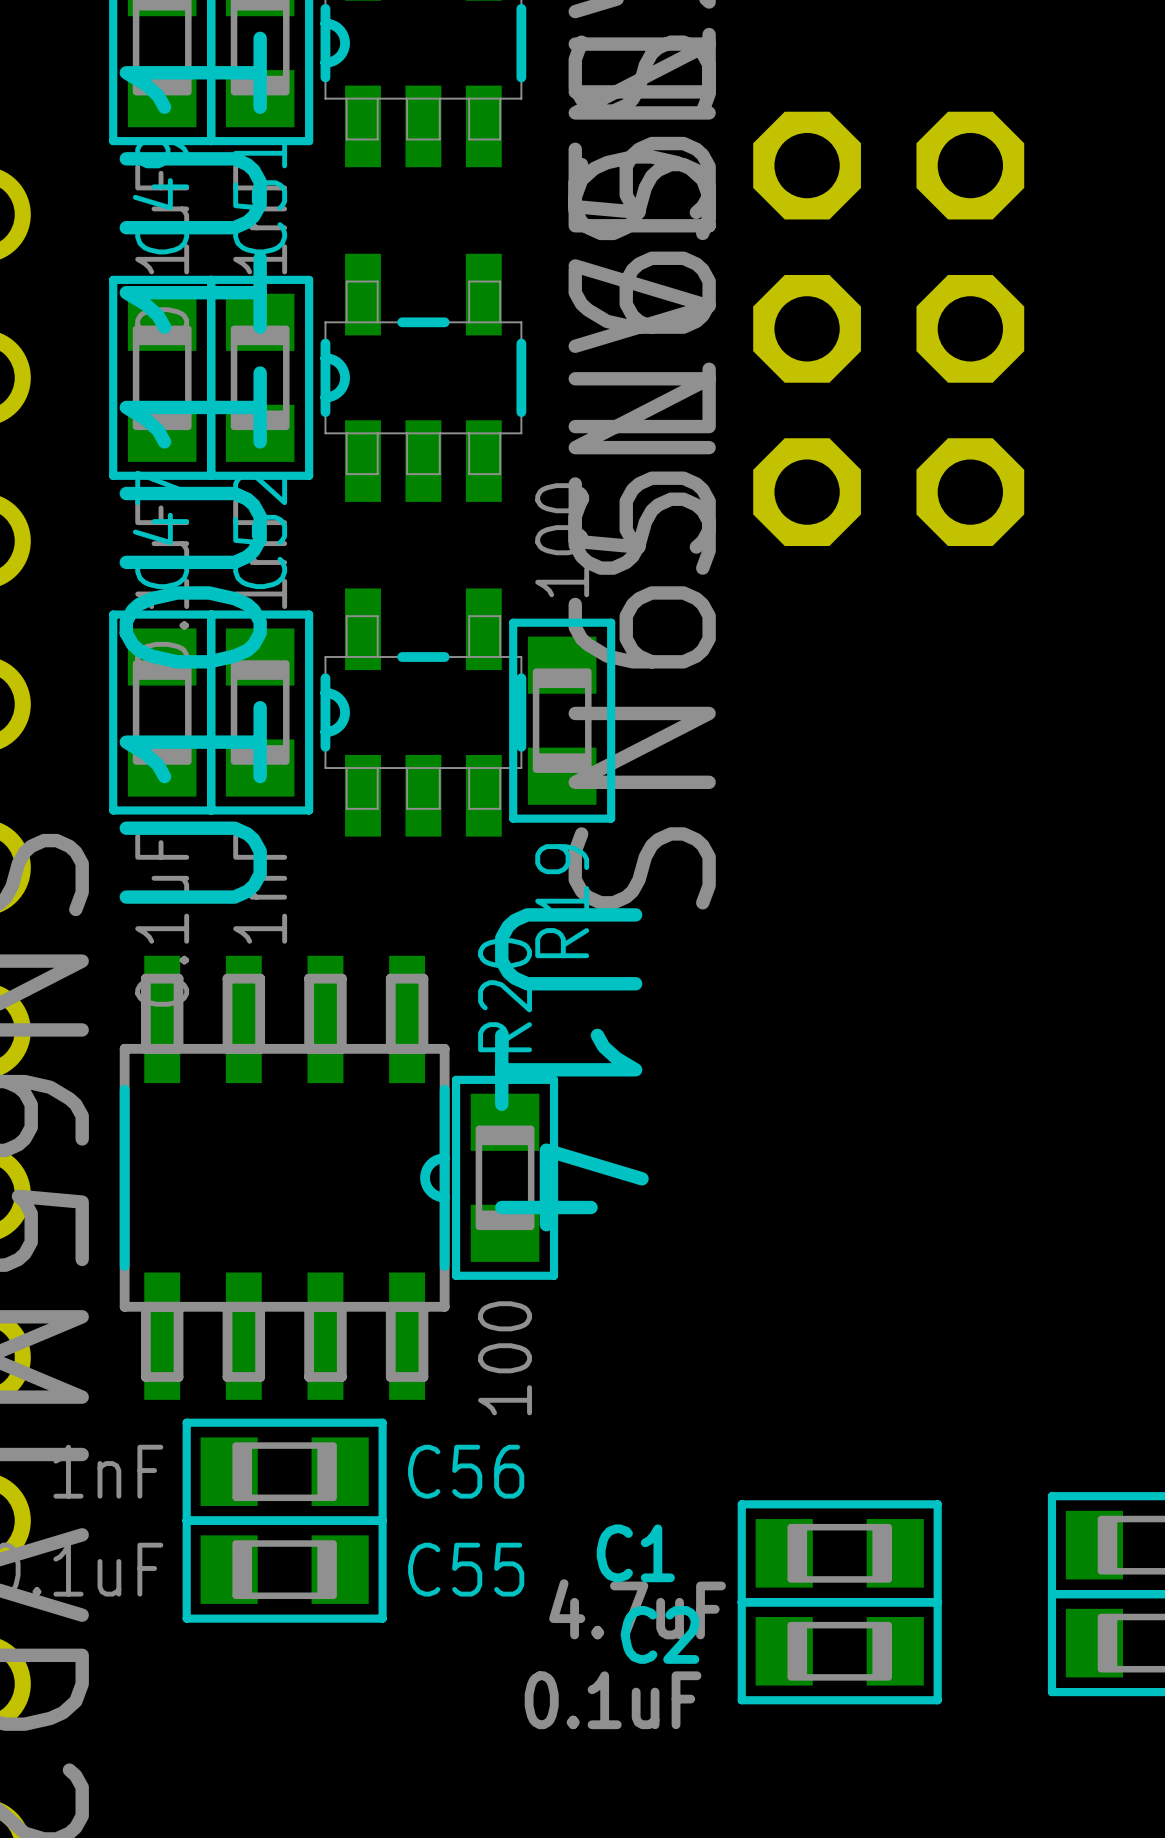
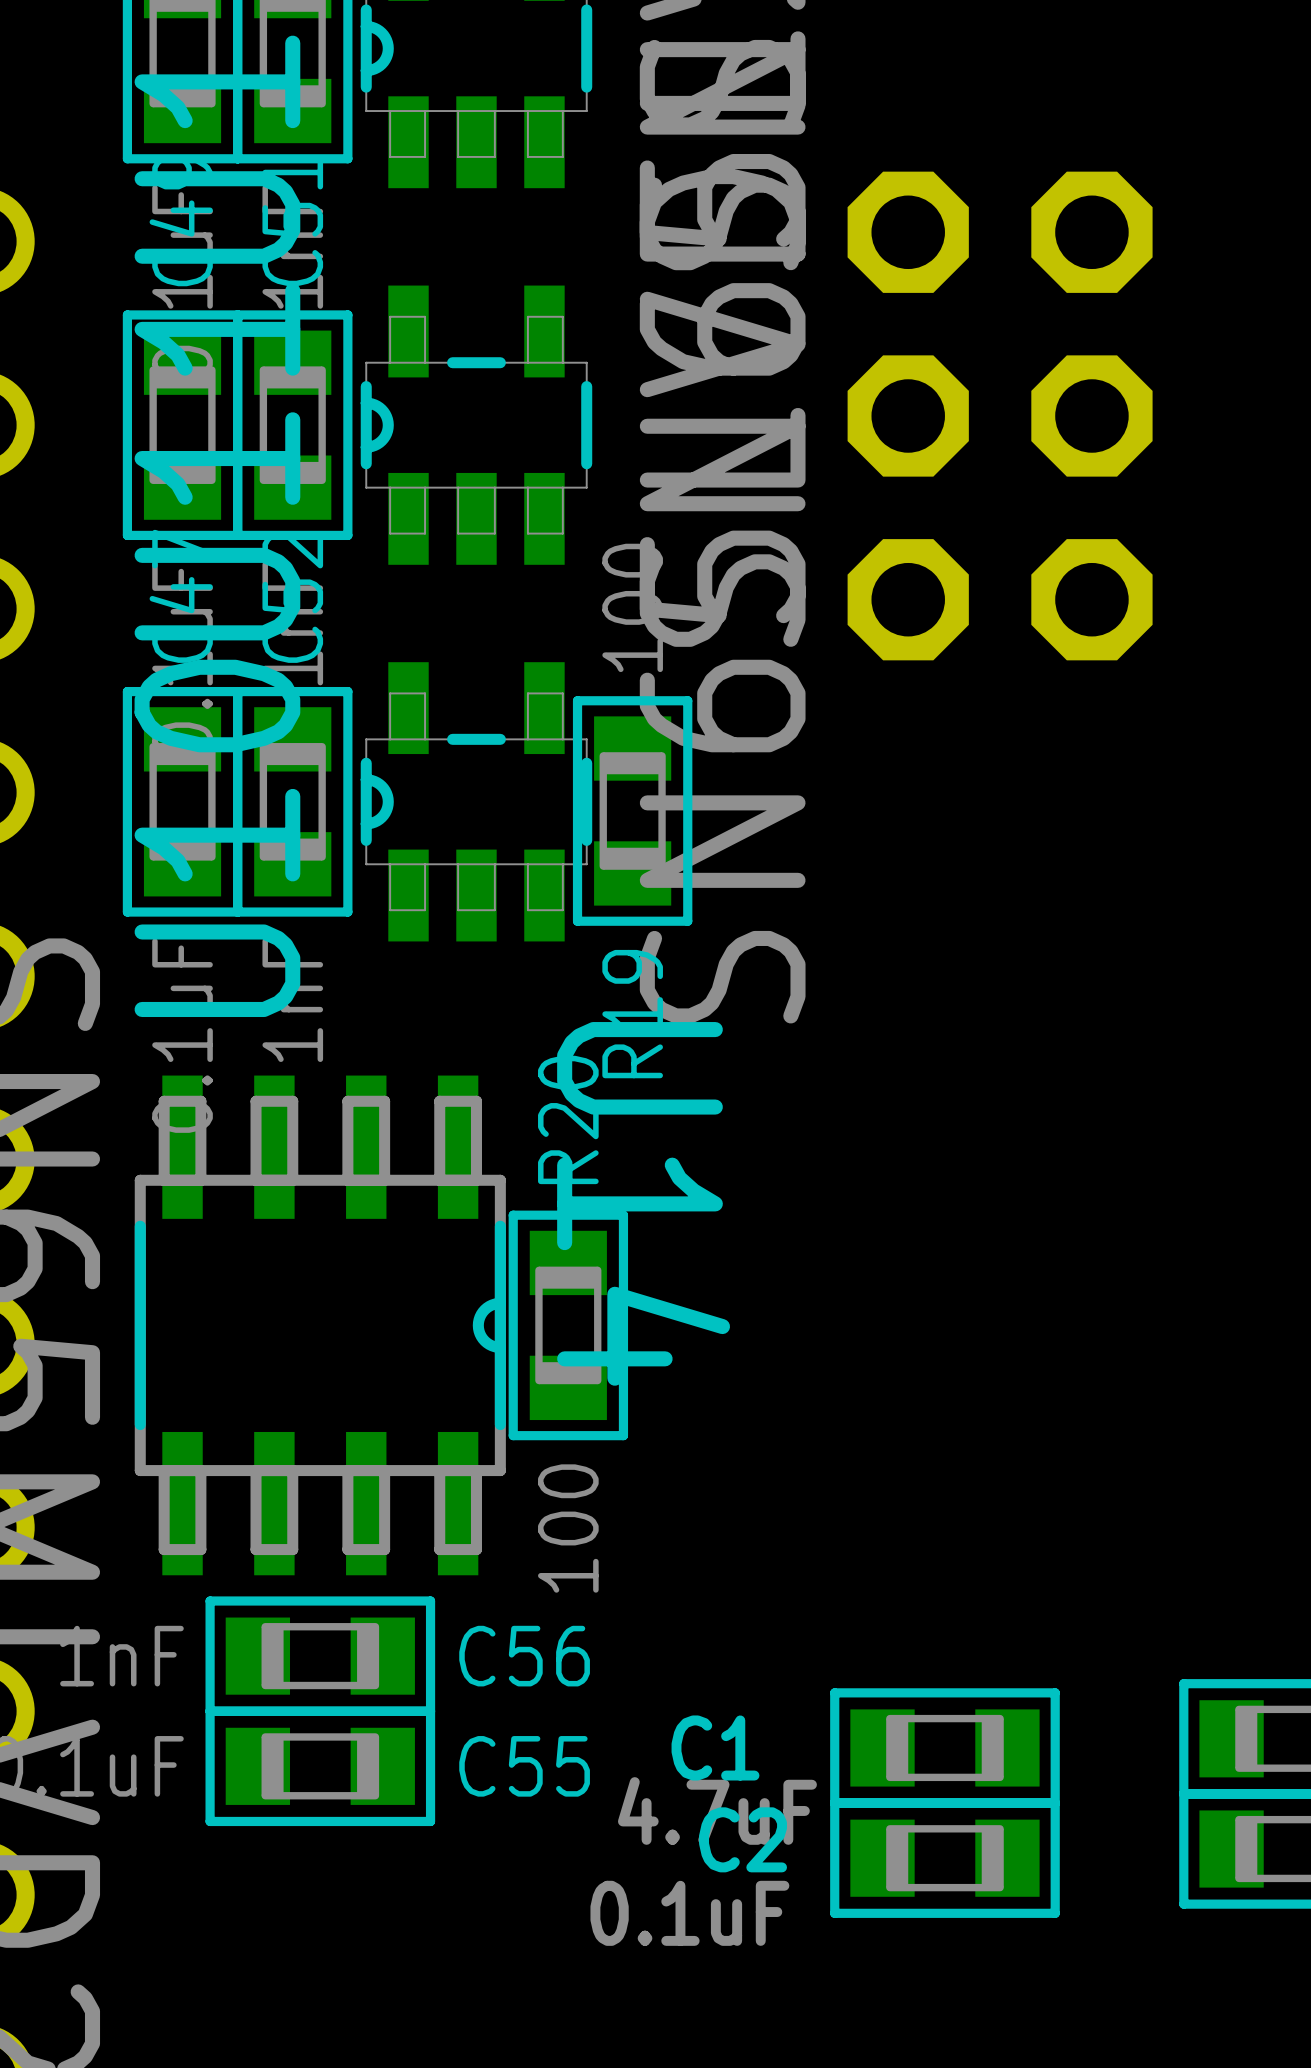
part position: (888, 328) -> (1000, 415)

